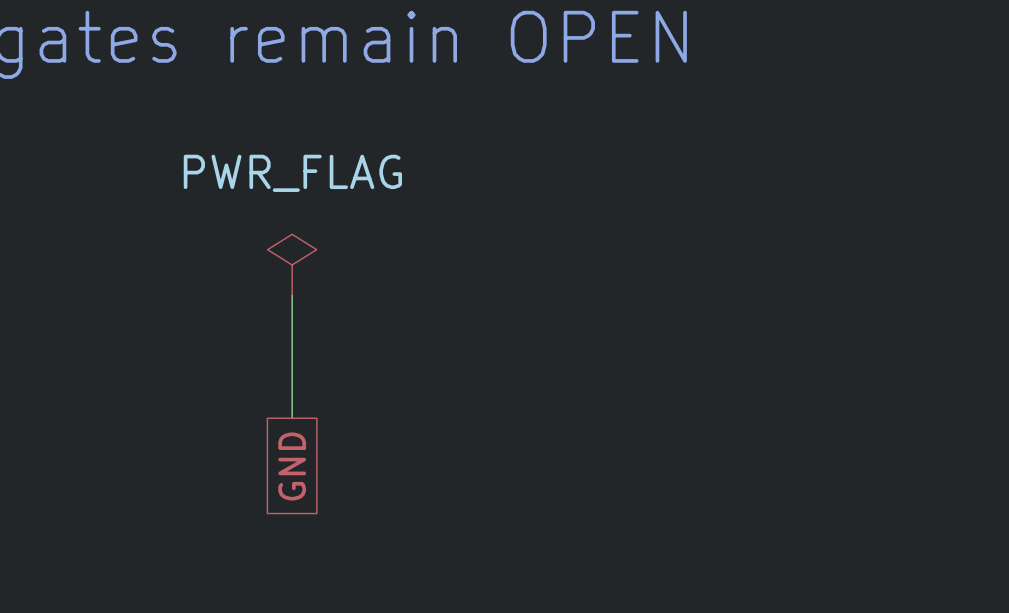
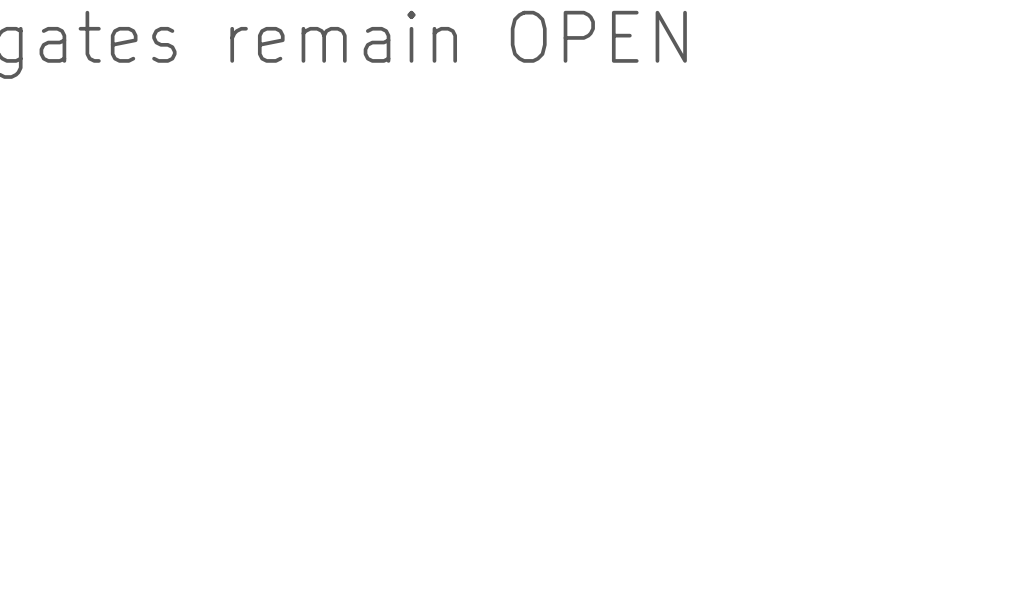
power symbol: PWR_FLAG (292, 264) -> none
wire: (292, 295) (292, 418) -> none
global label: GND (292, 466) -> none

